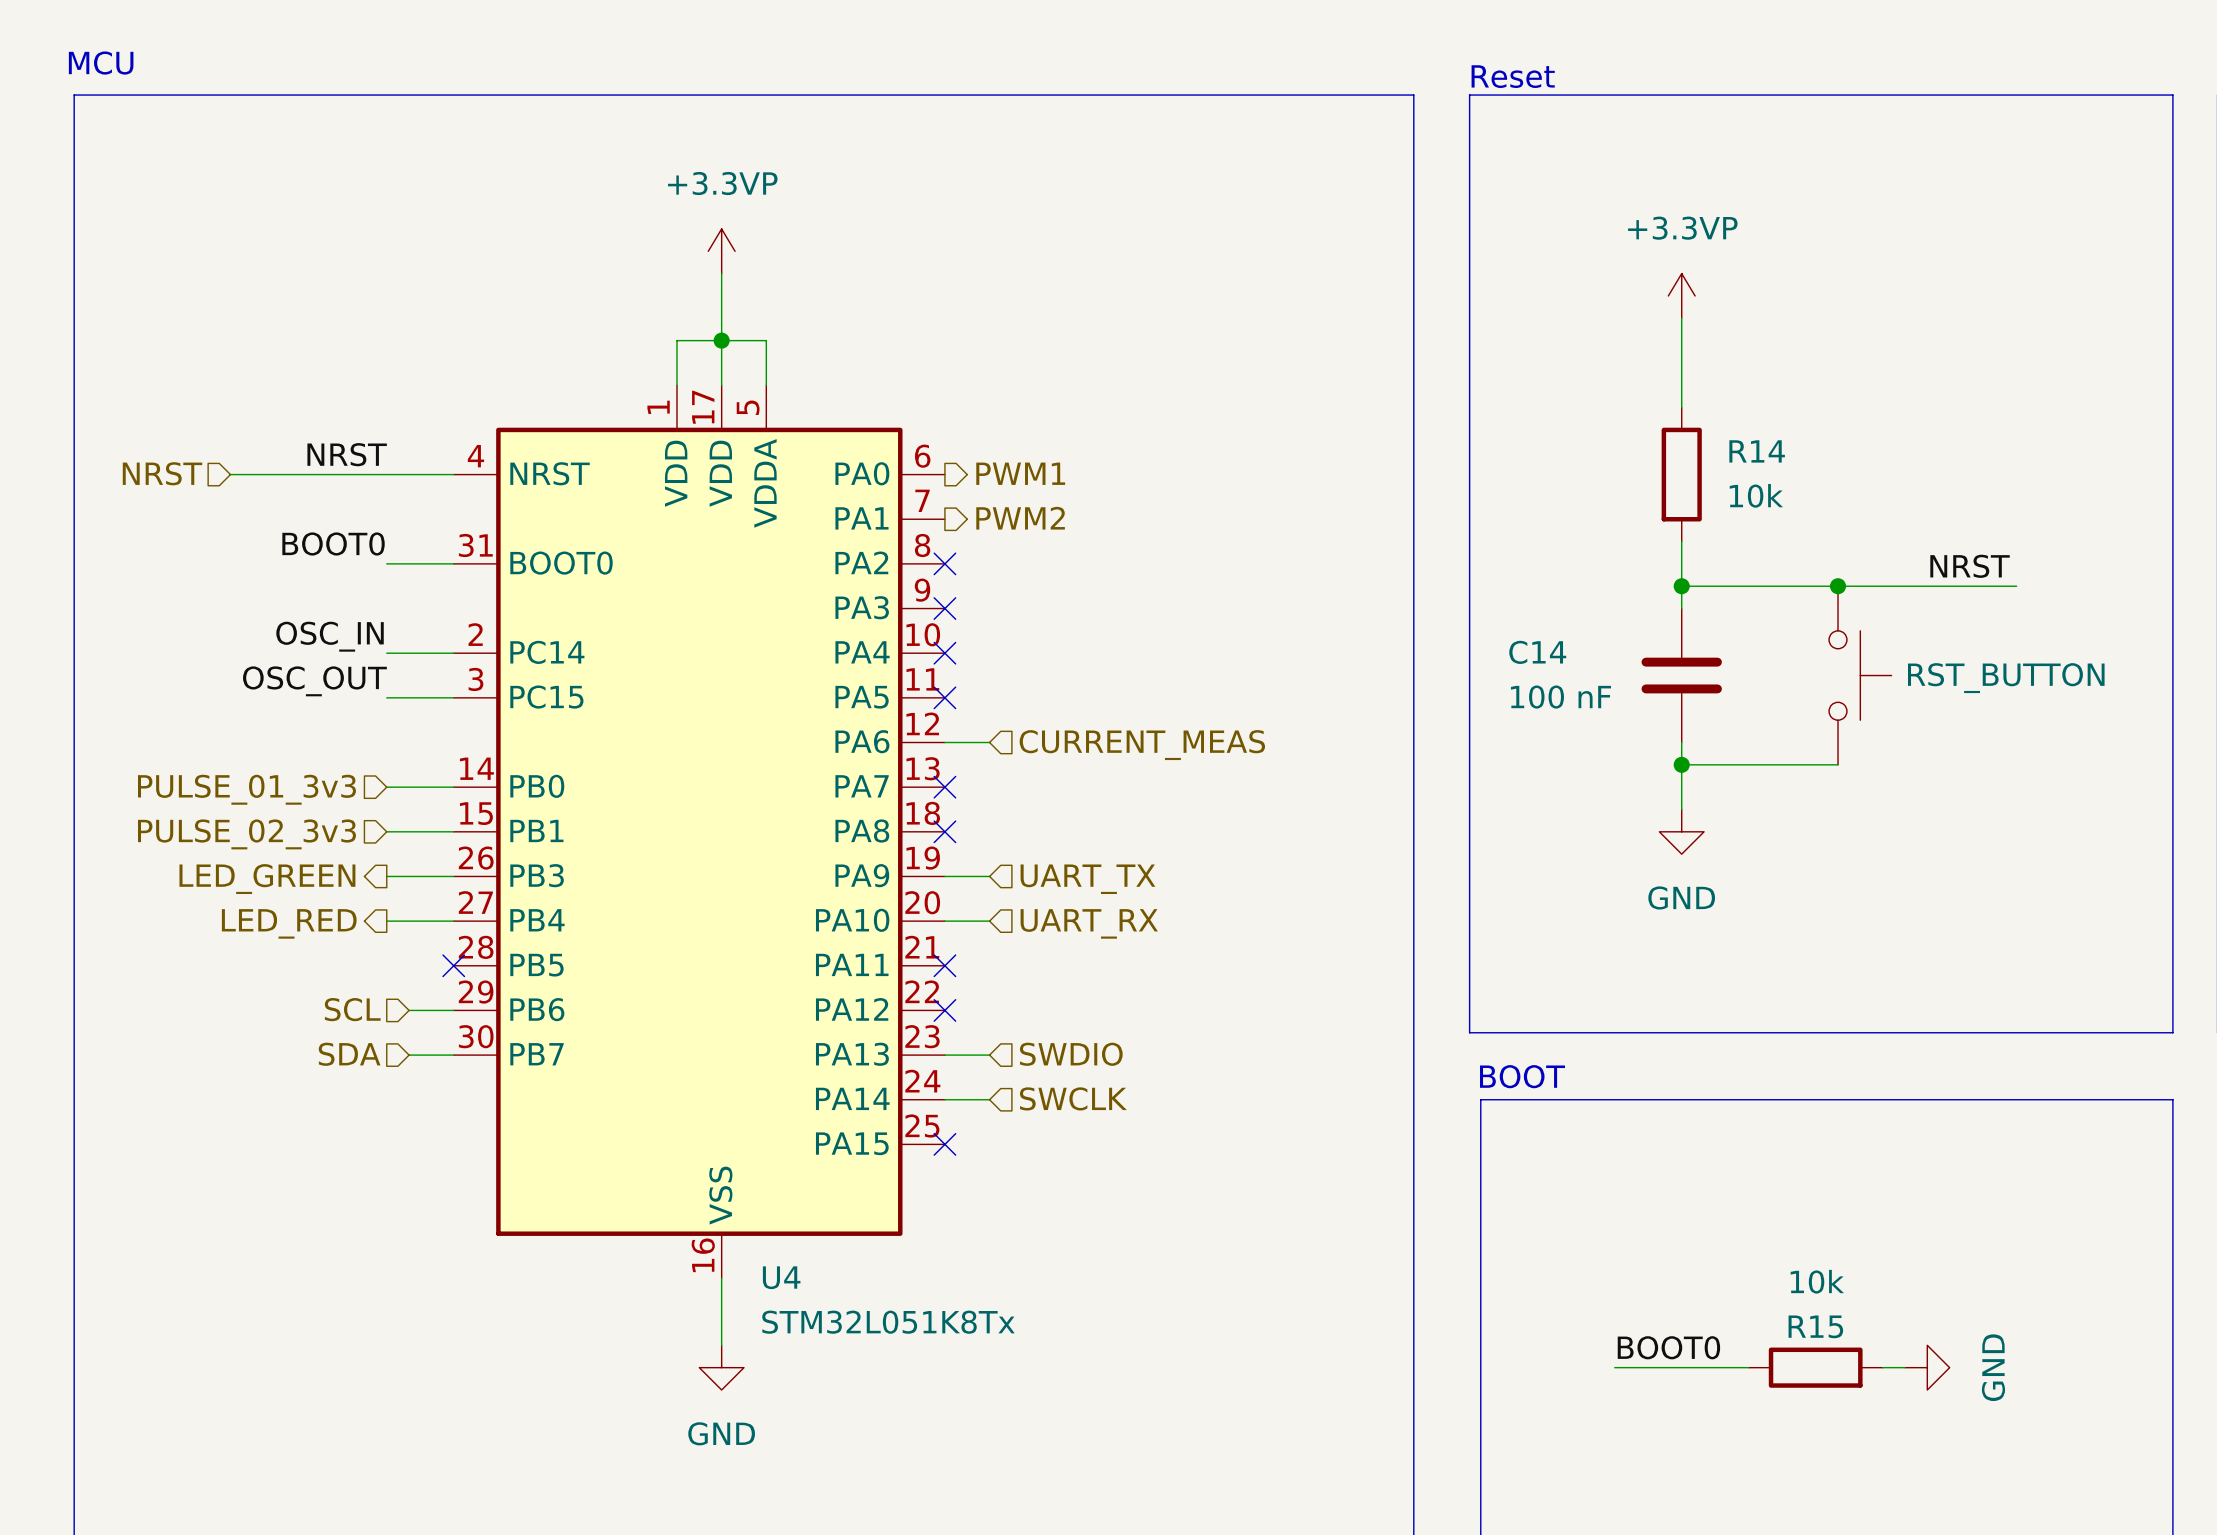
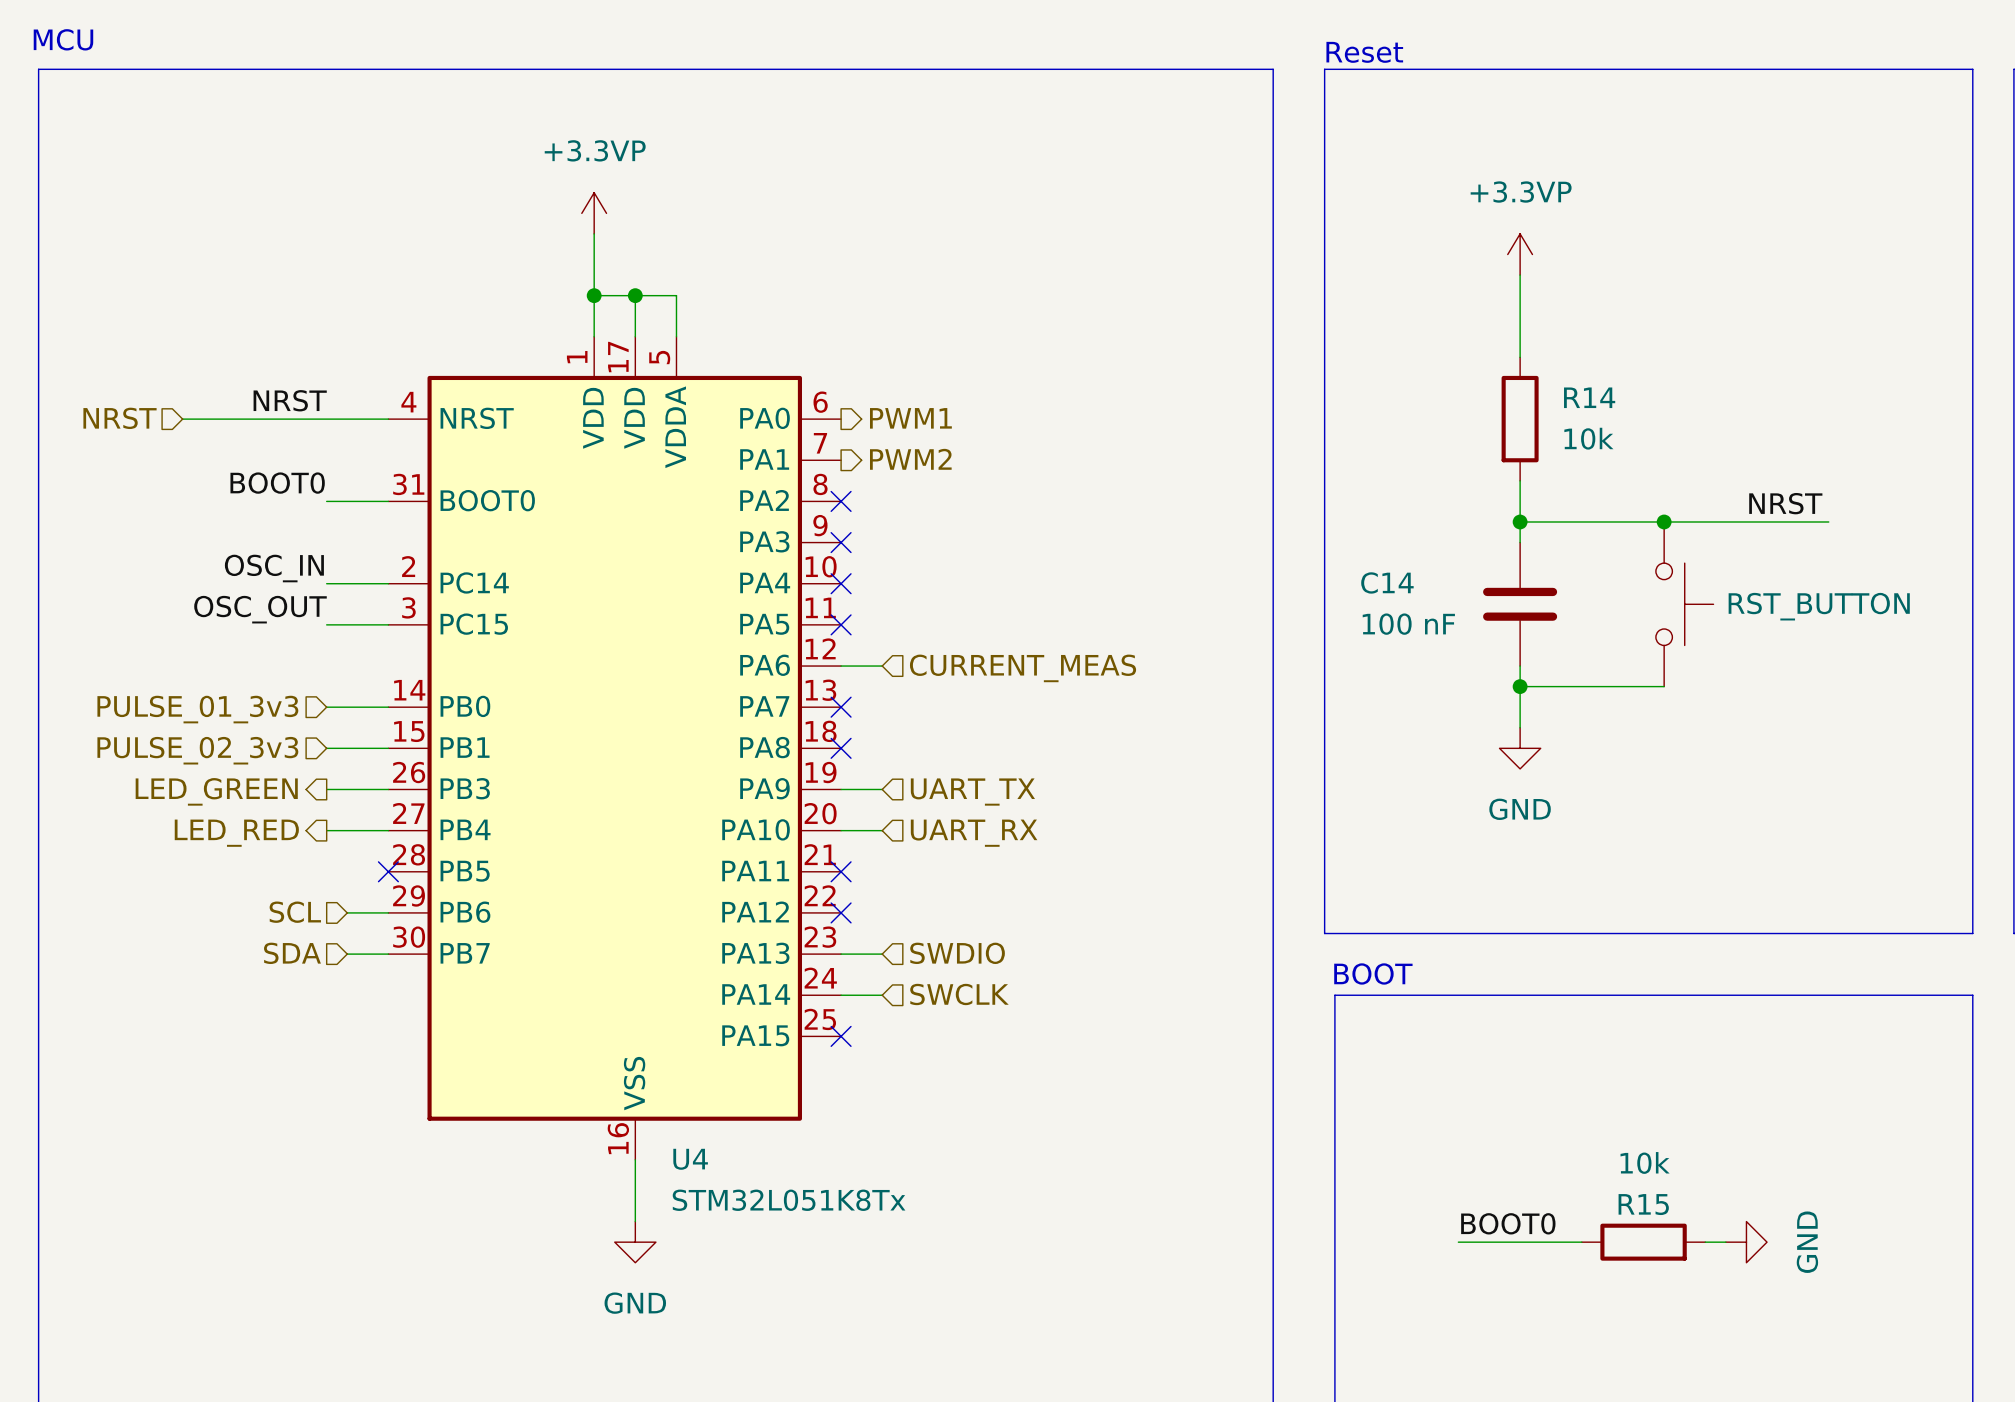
power symbol position: +3.3VP (721, 251) -> +3.3VP (594, 213)
wire: (721, 273) (721, 340) -> (594, 233) (594, 295)
junction: none -> (594, 295)

